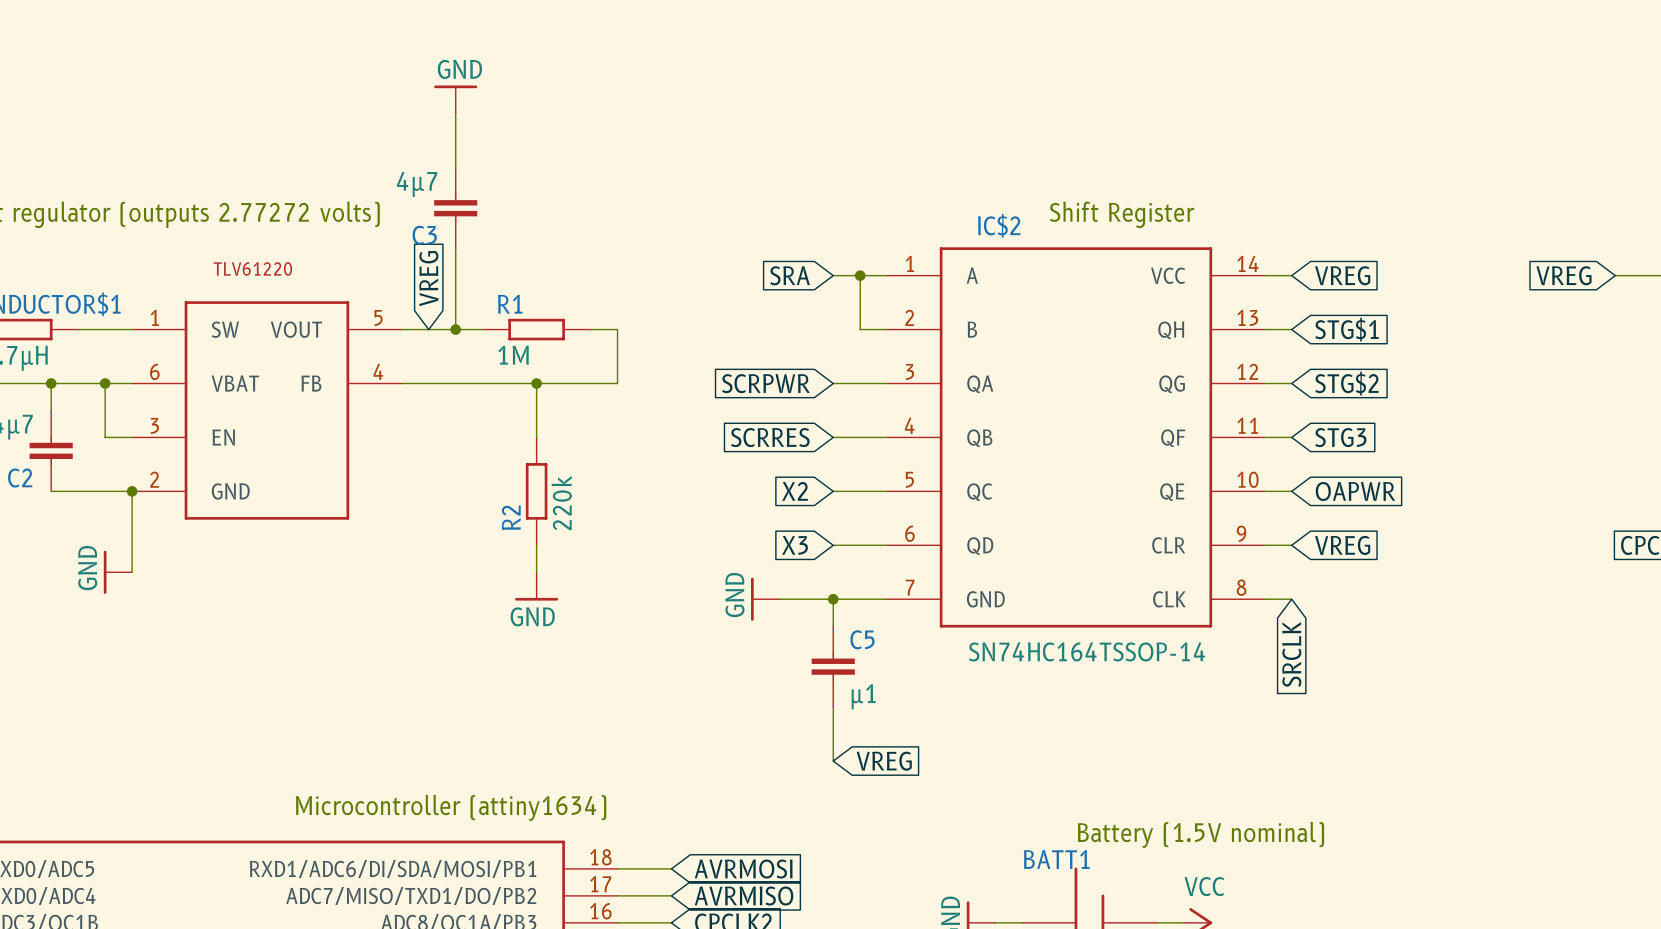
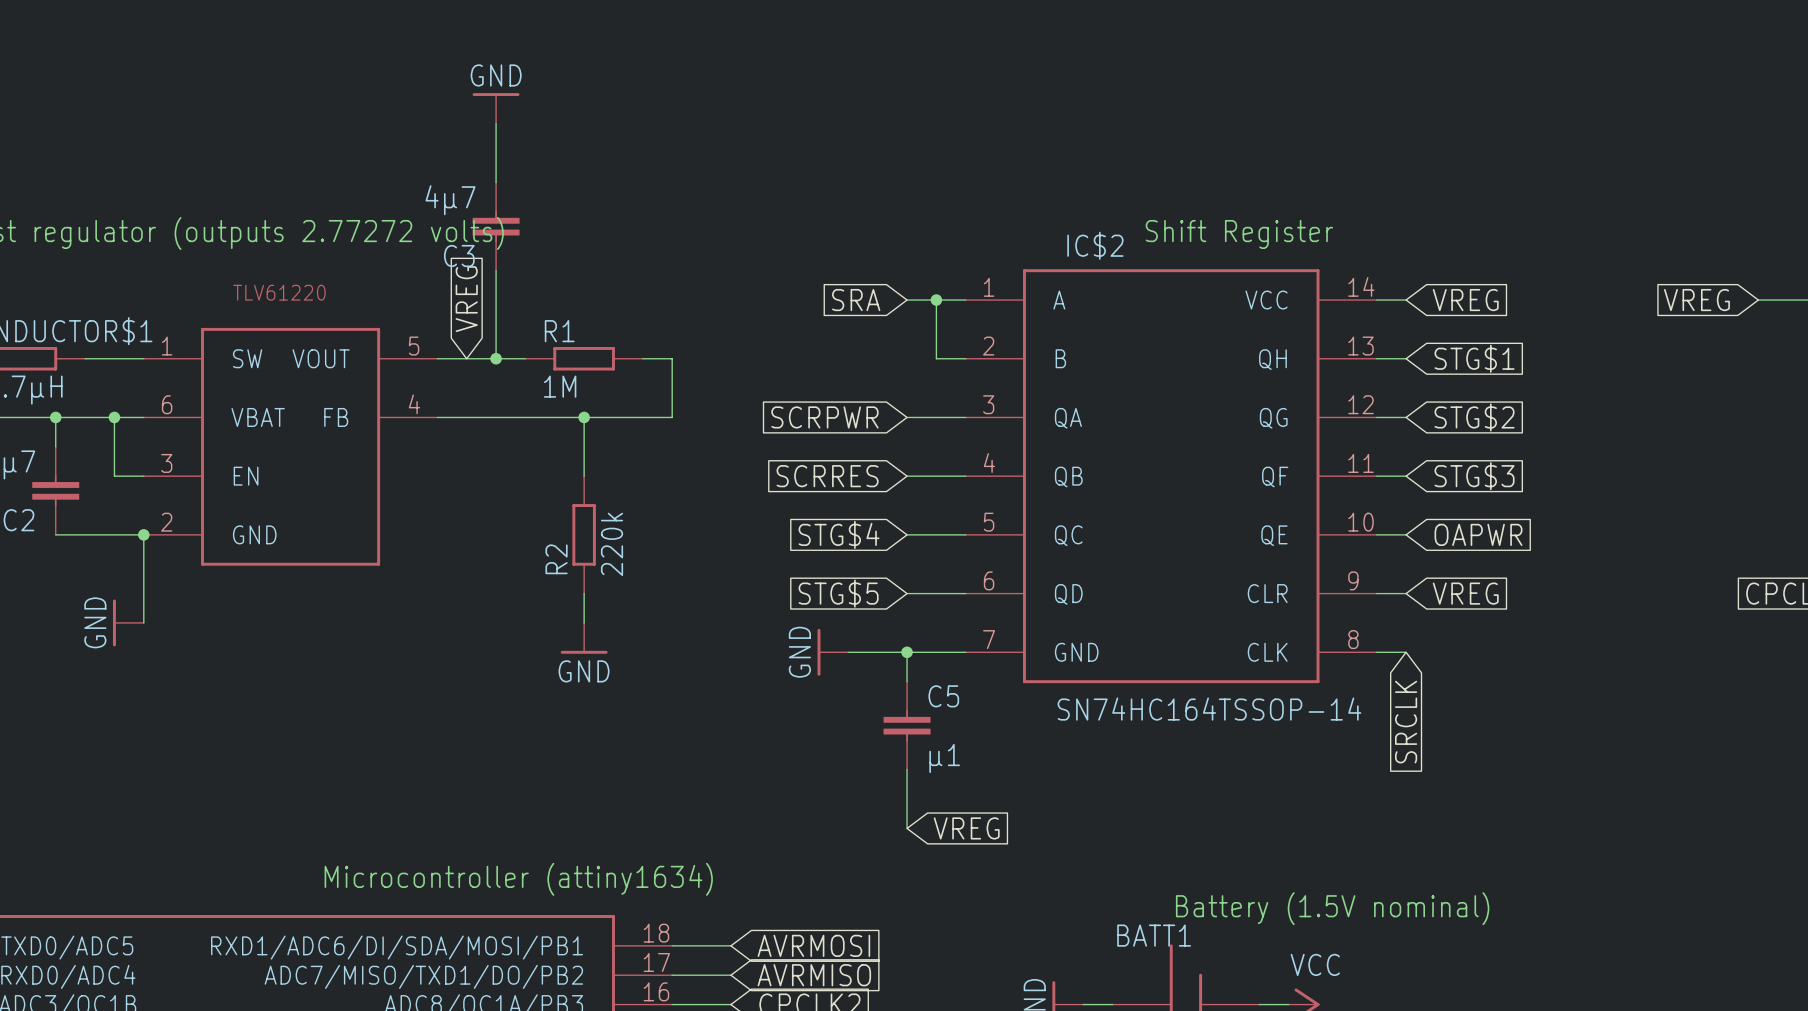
global label: STG3 (1340, 437) -> STG$3 (1474, 476)
global label: X2 (795, 491) -> STG$4 (839, 534)
global label: X3 (795, 545) -> STG$5 (838, 593)

